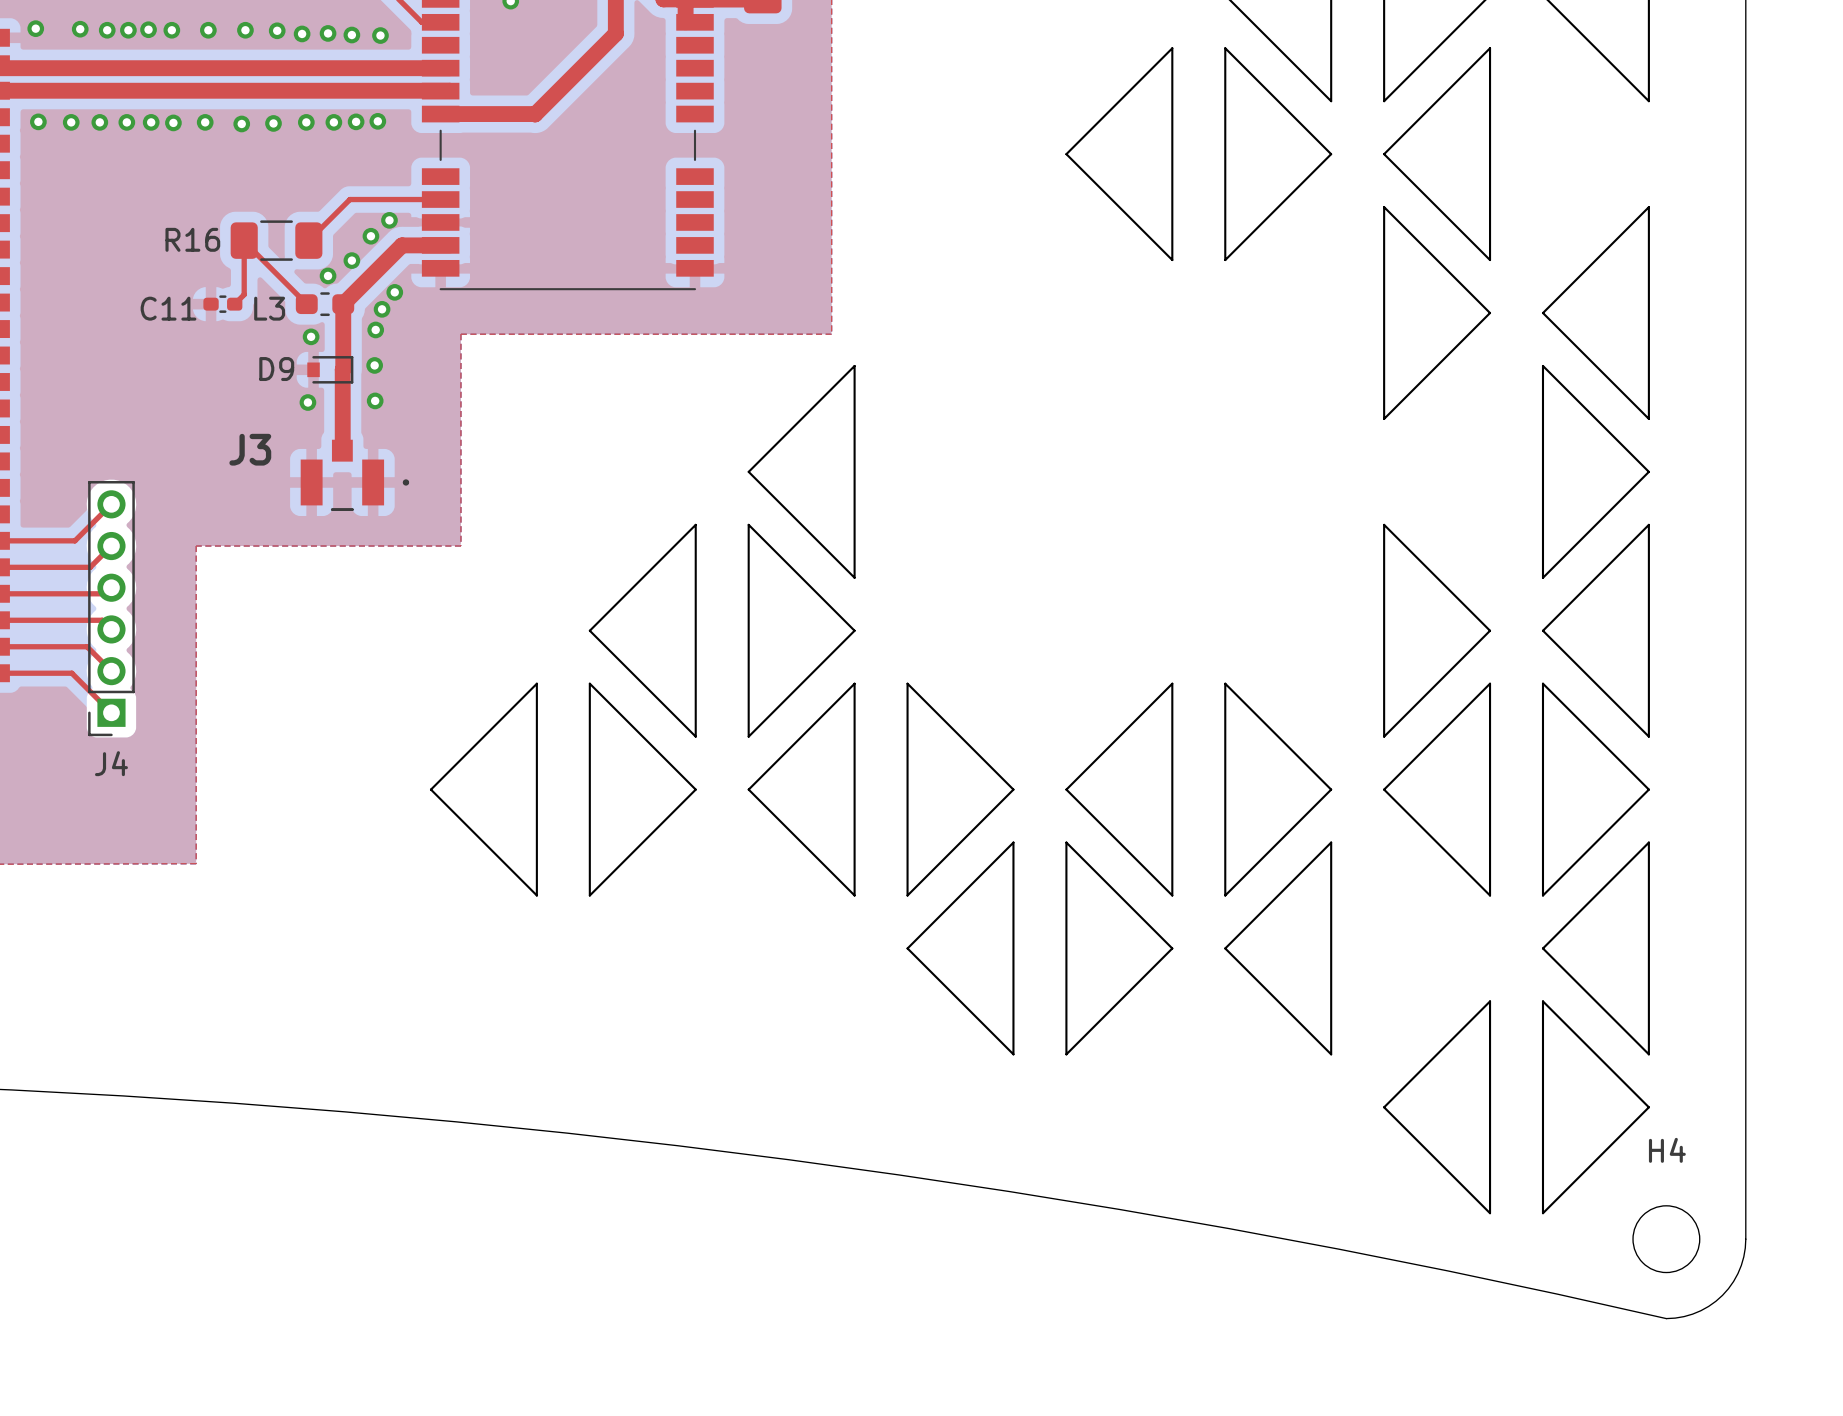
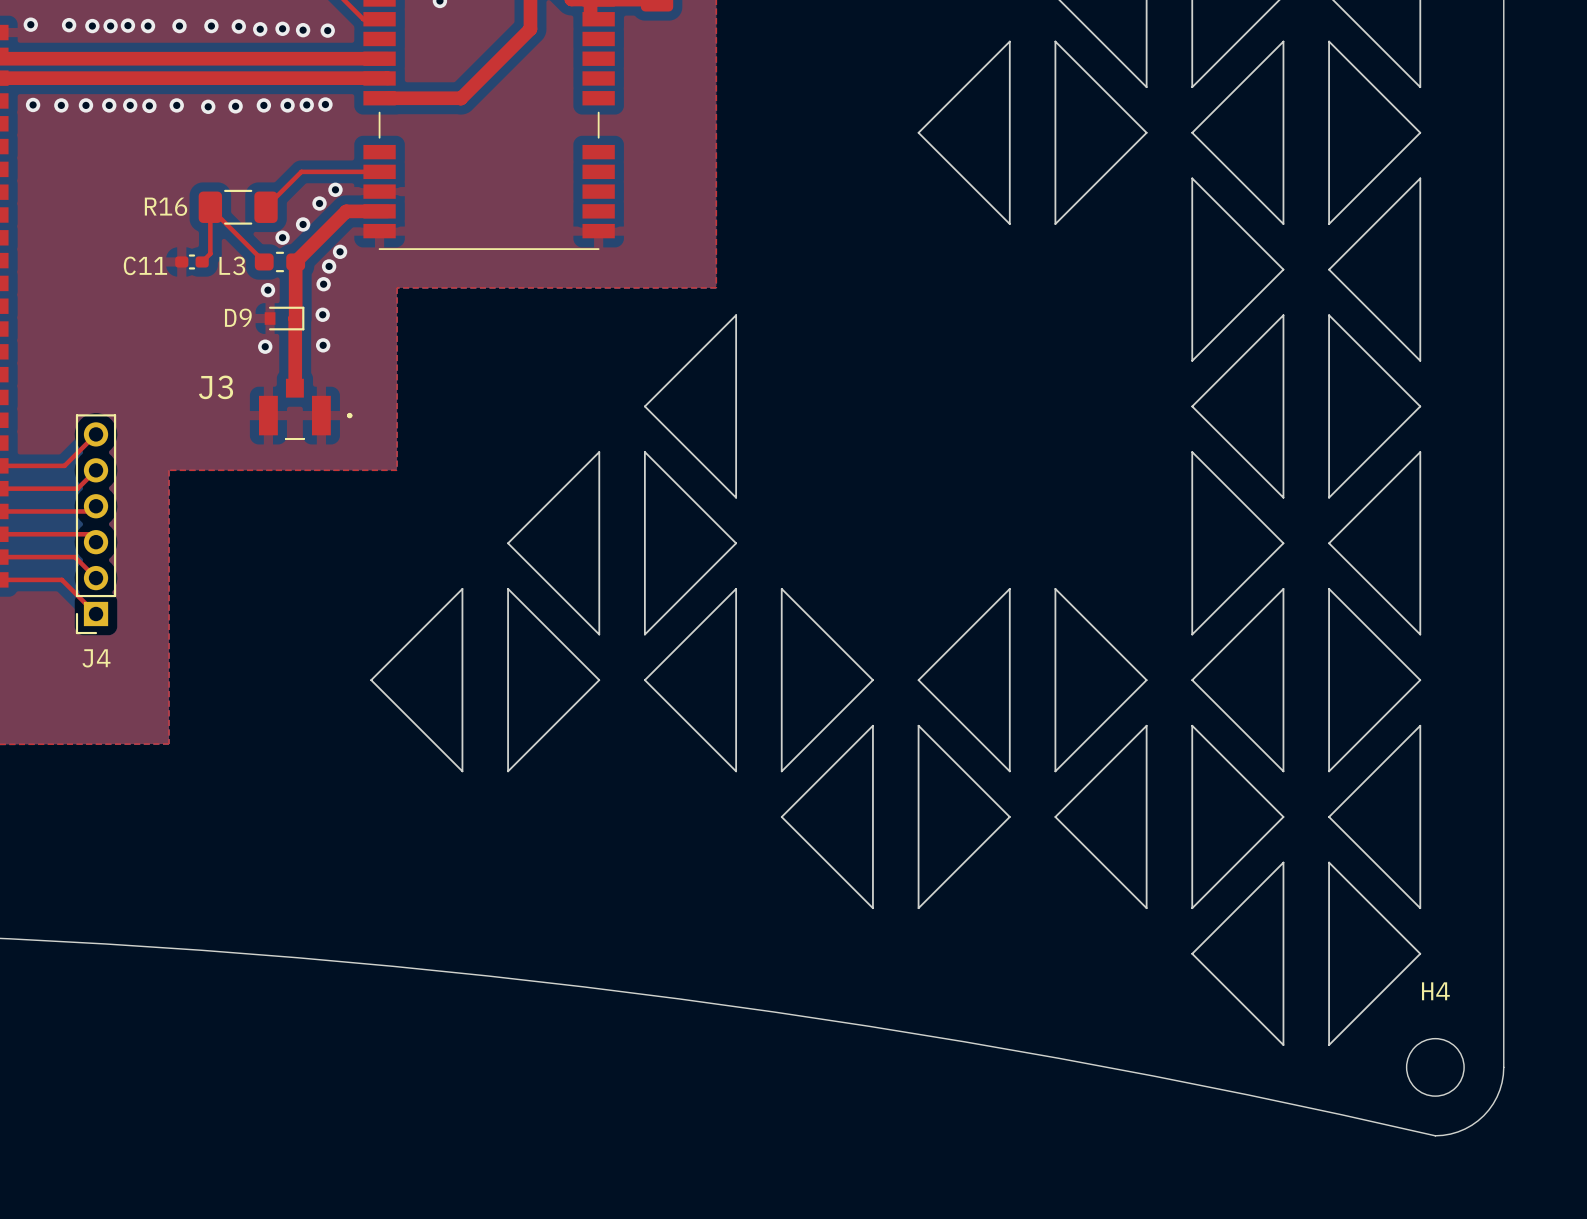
board edge: none -> (1329, 41) (1329, 224) (1420, 132) (1329, 41)
board edge: none -> (1283, 315) (1283, 497) (1192, 406) (1283, 315)
board edge: none -> (1192, 725) (1283, 816) (1192, 908) (1192, 725)

